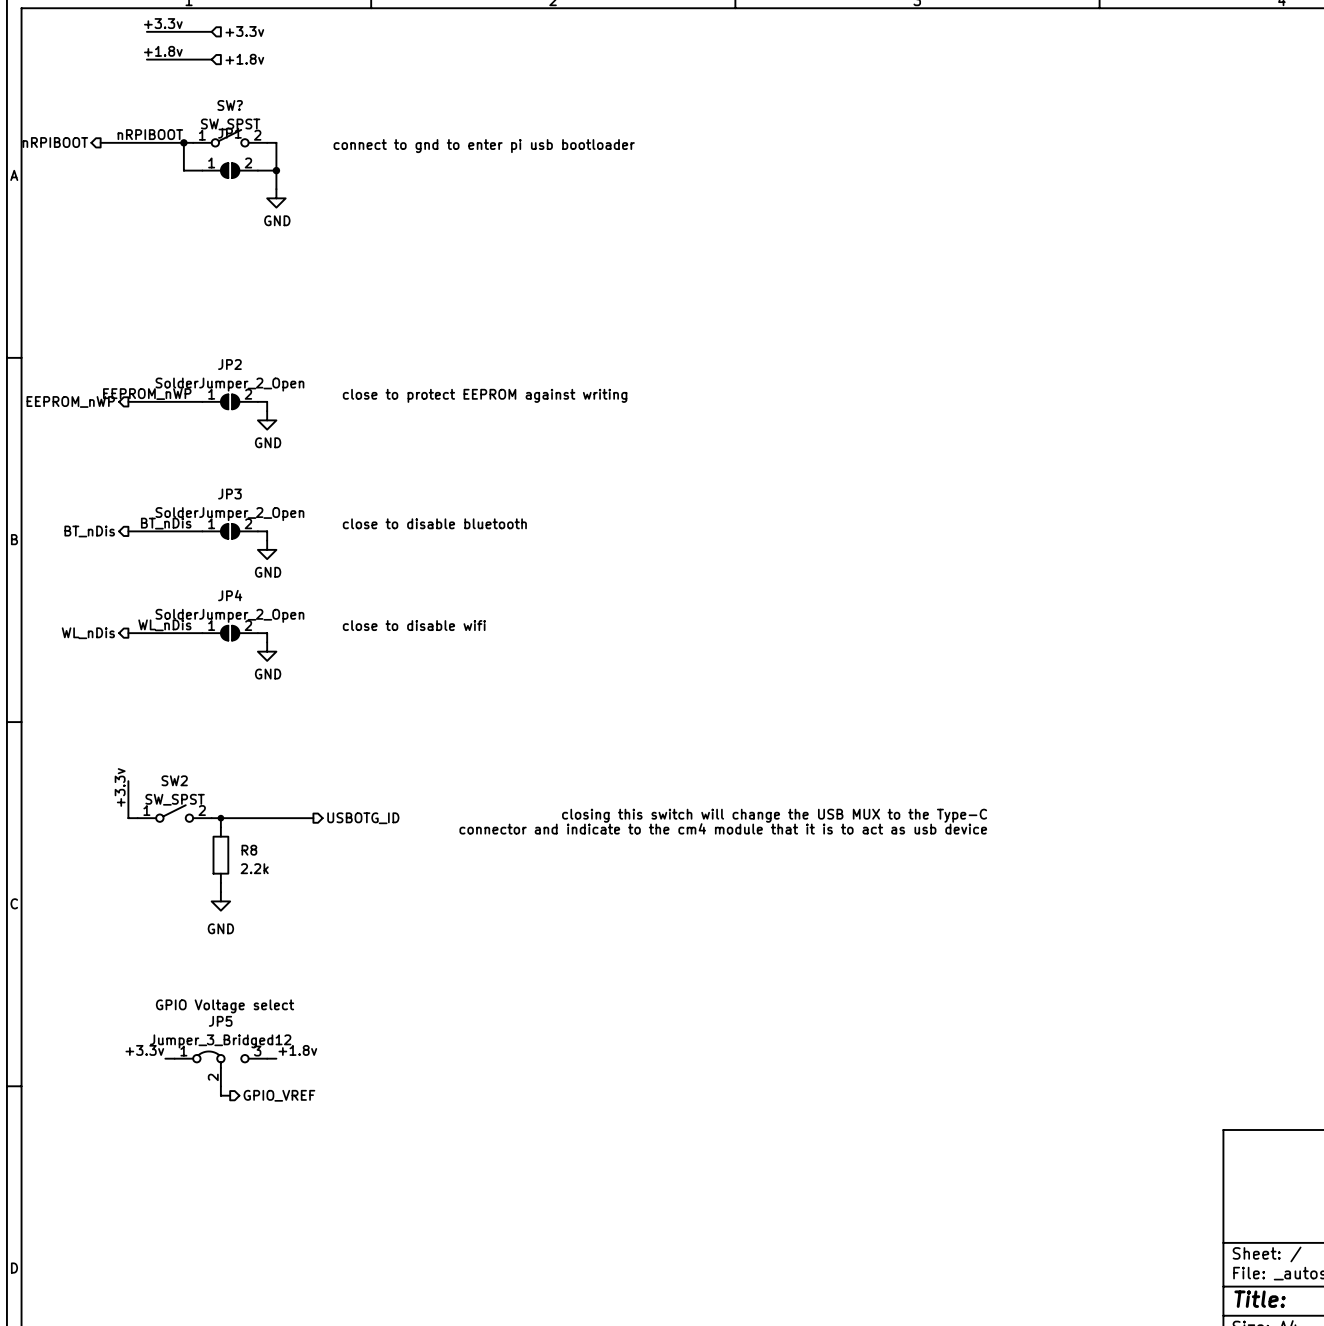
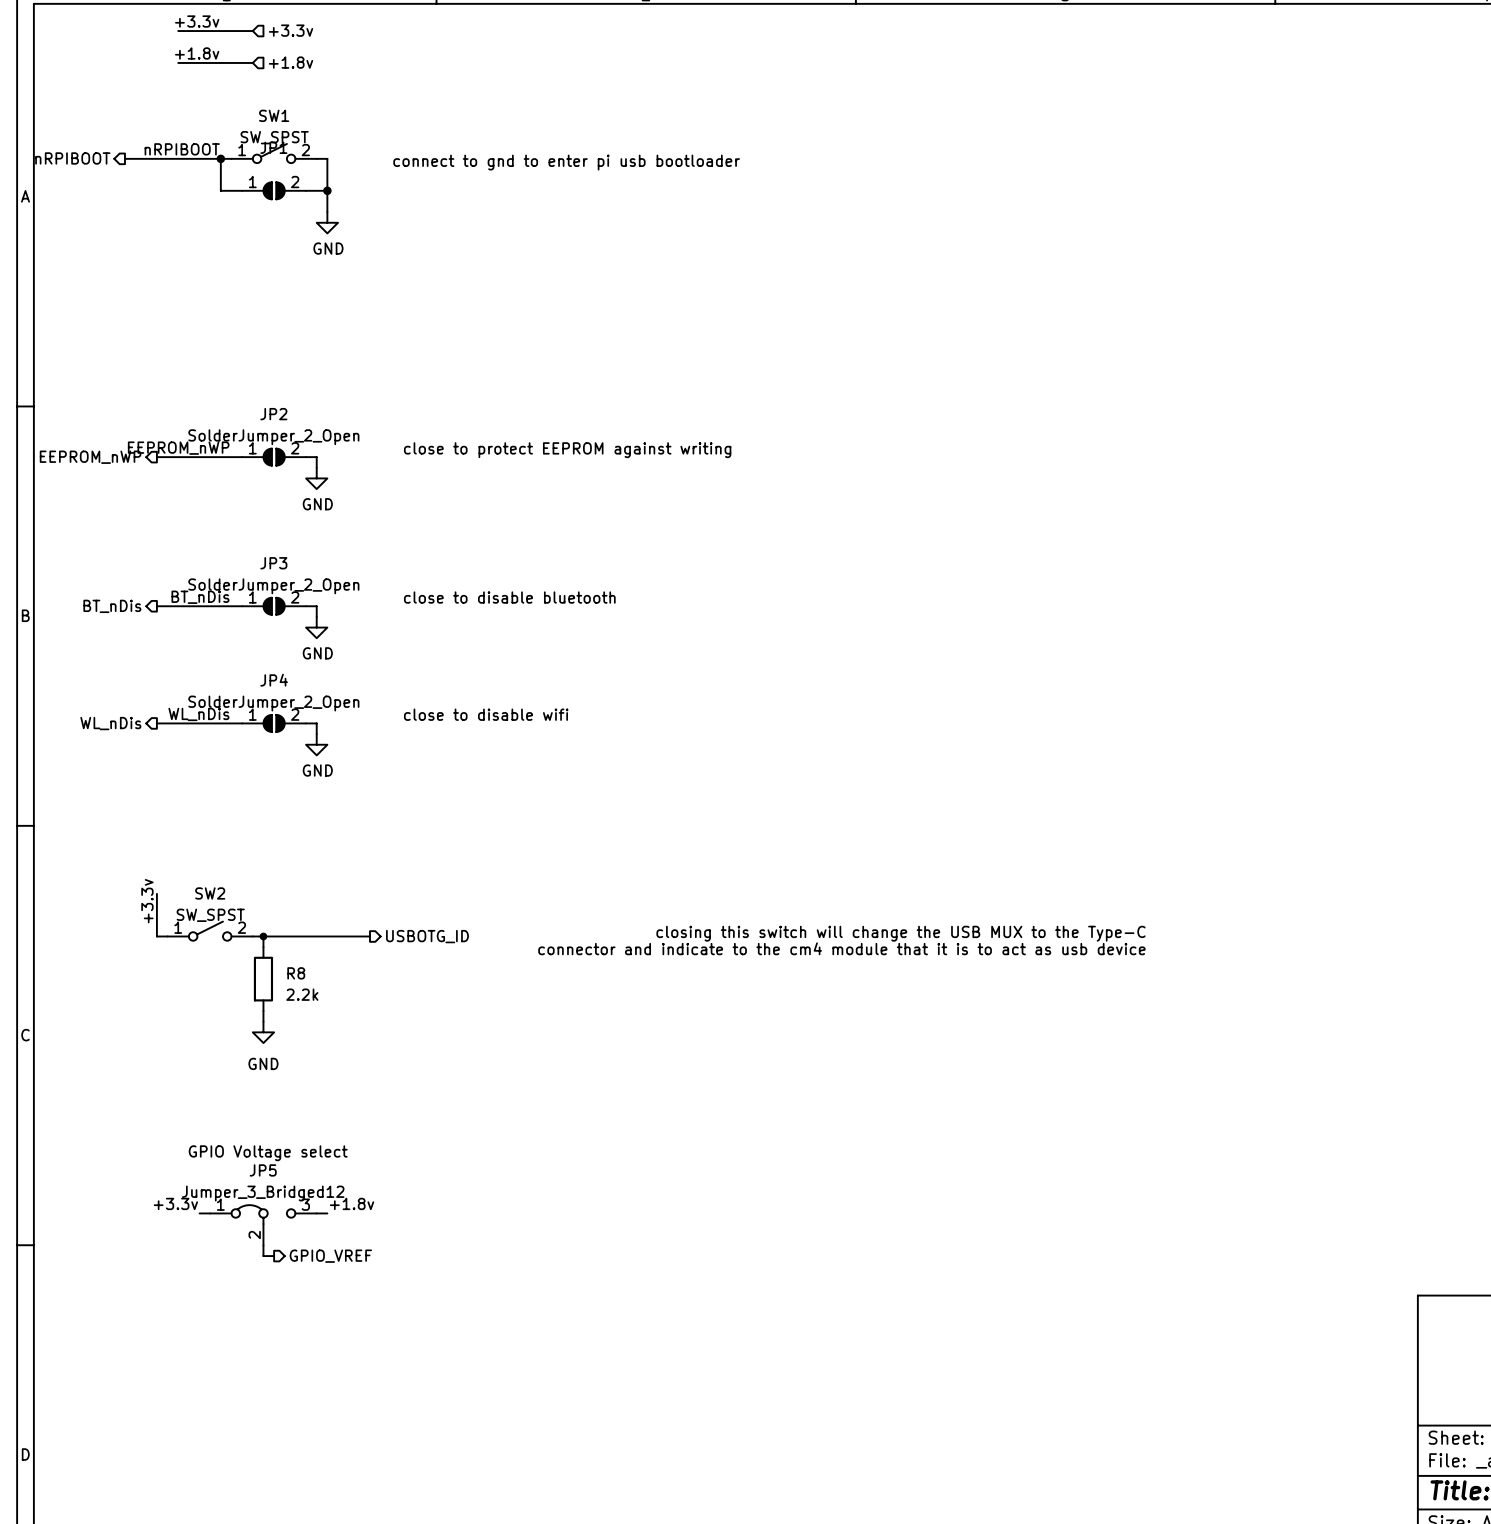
SW? name: SW? (230, 105) -> SW1 (274, 115)

